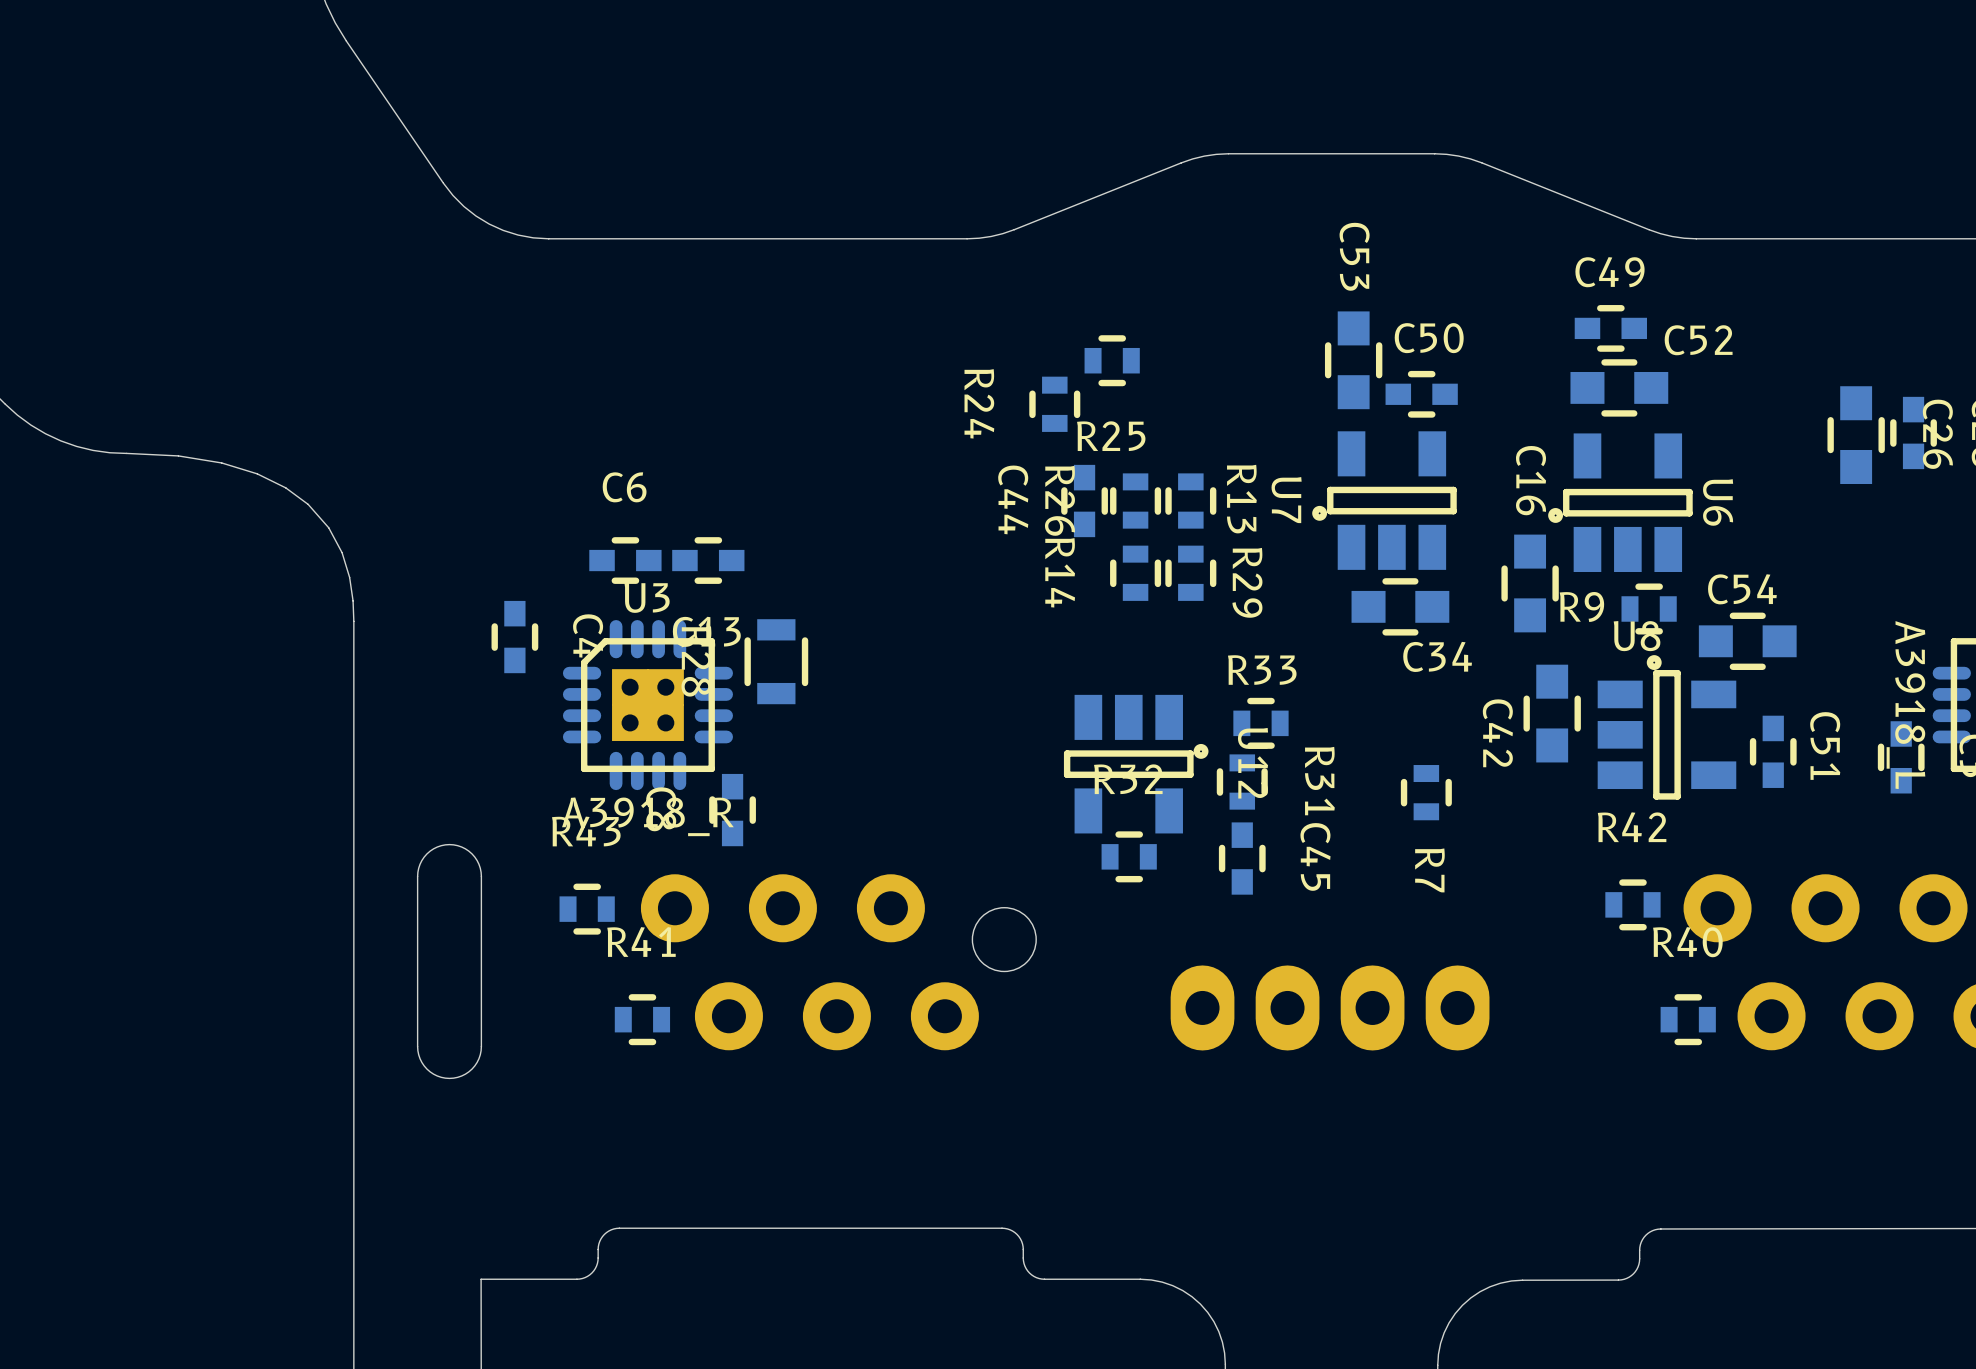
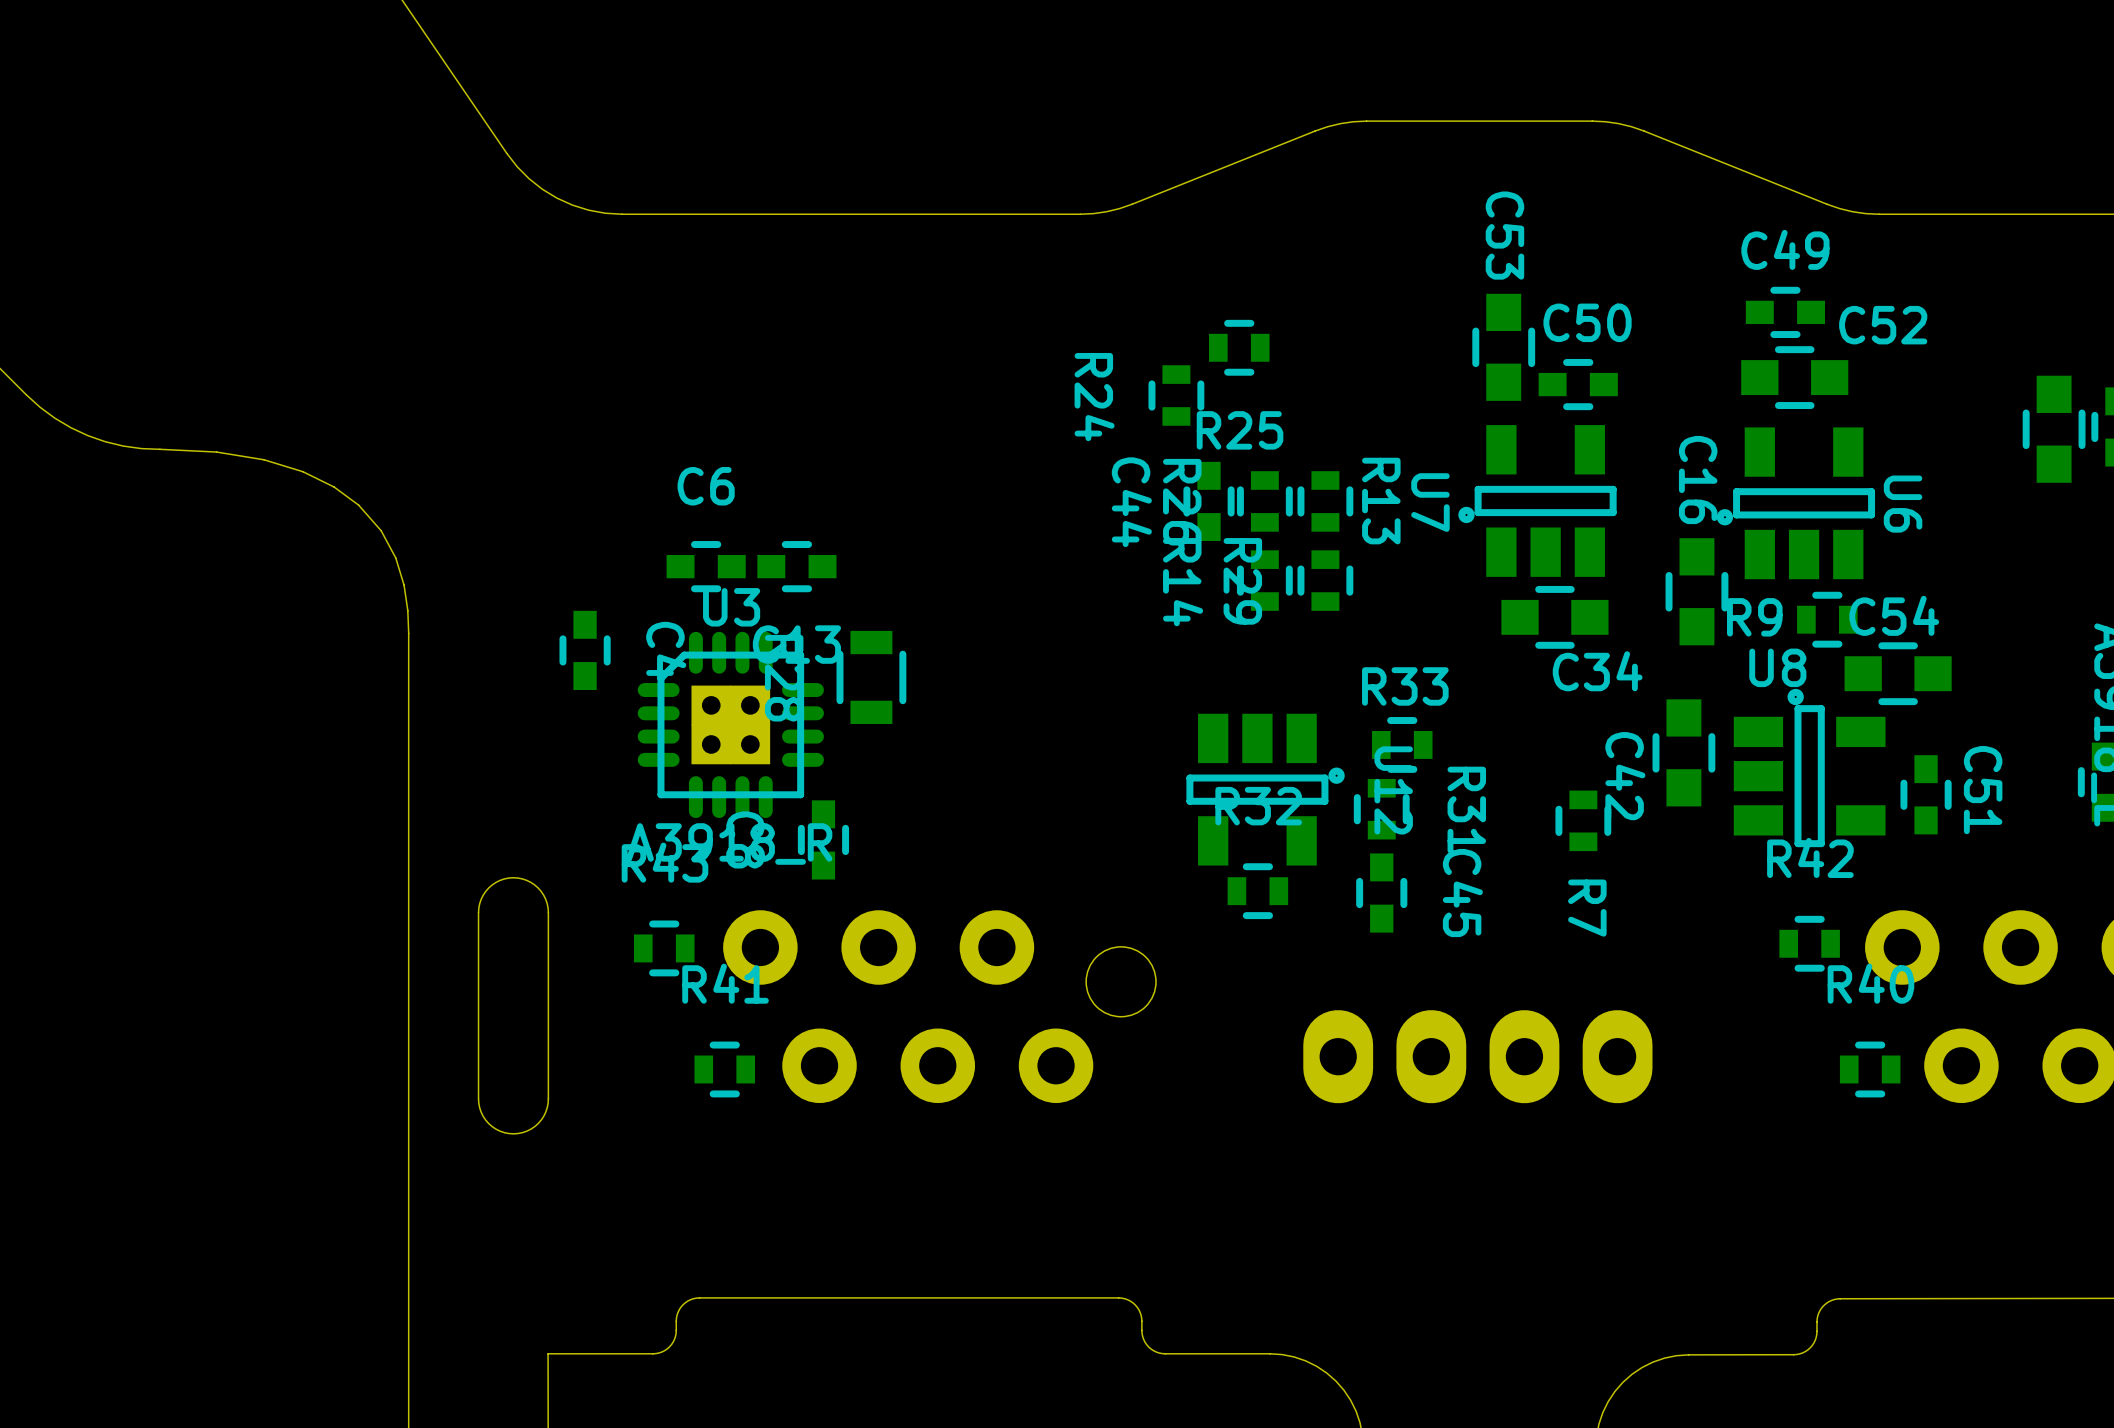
R29 name position: R29 (1247, 582) -> R29 (1242, 581)
C54 position: (1747, 641) -> (1898, 673)
C42 position: (1552, 713) -> (1683, 752)
U8 position: (1666, 727) -> (1809, 768)
C51 position: (1773, 751) -> (1926, 794)

